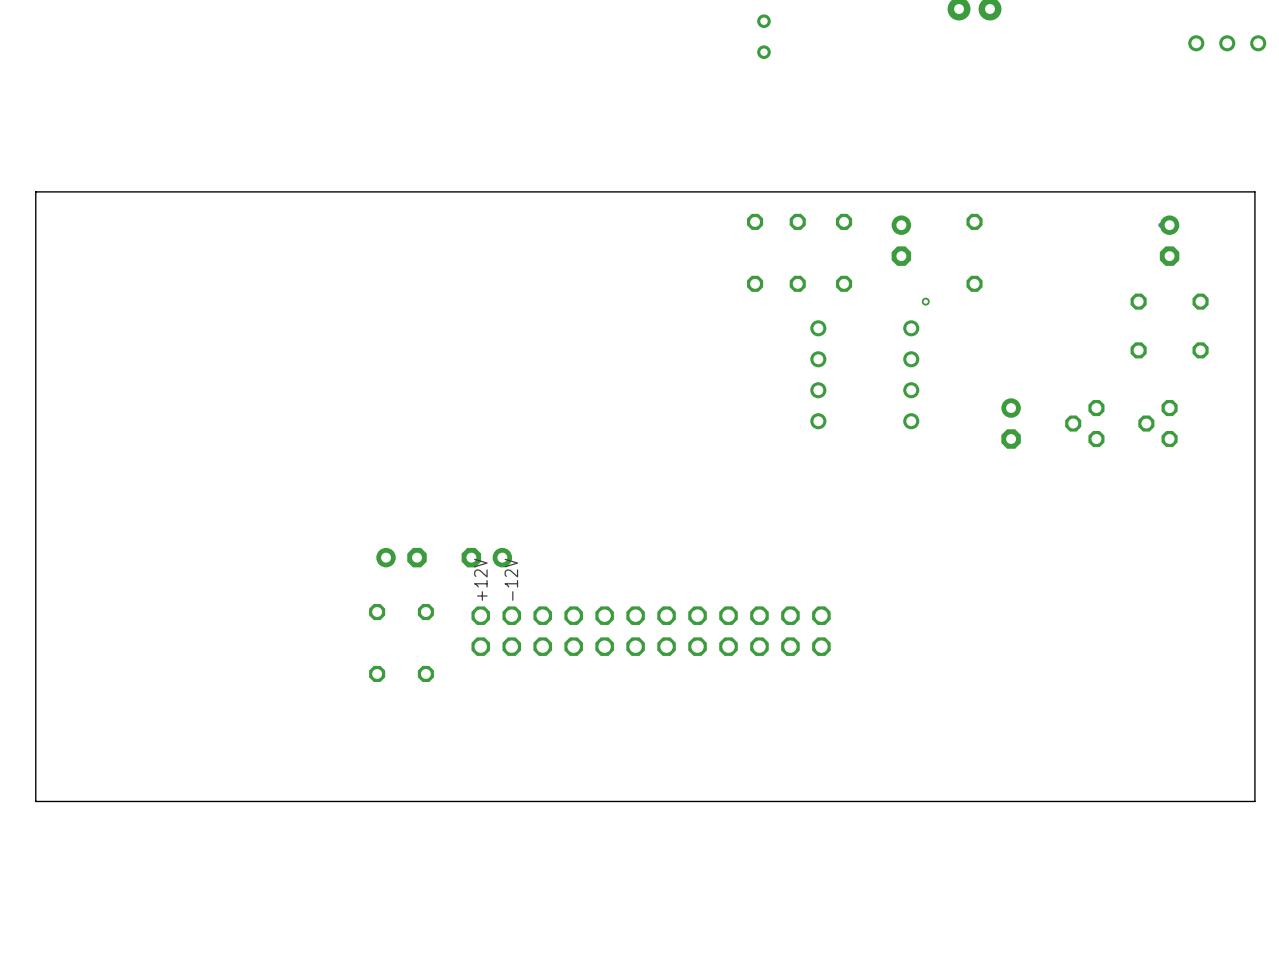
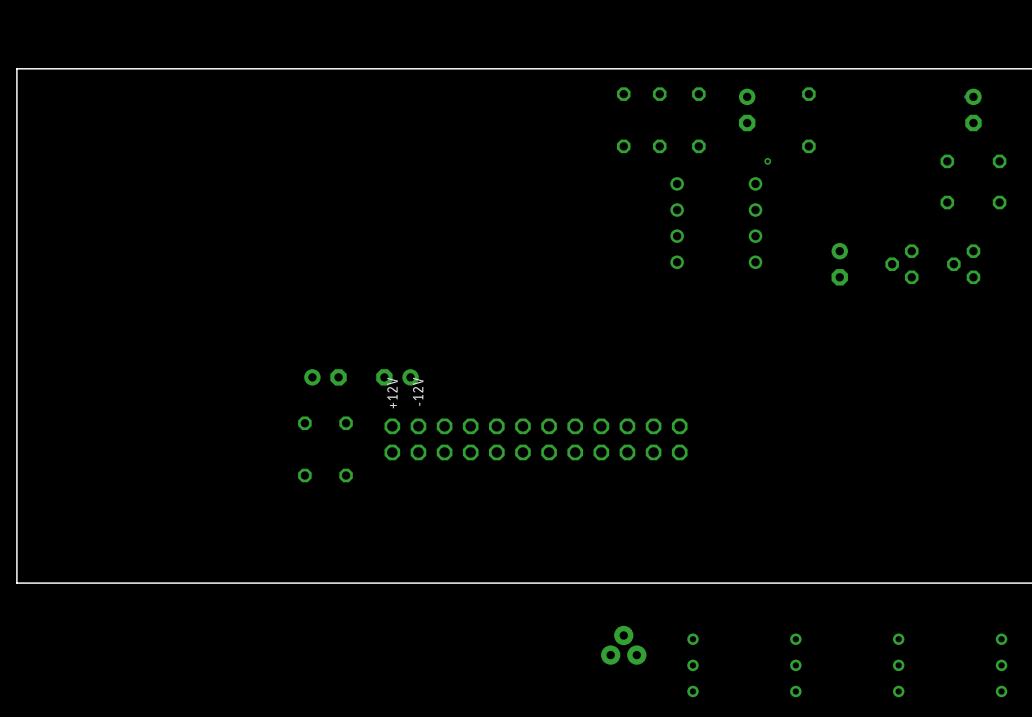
part: none -> (623, 645)
part: none -> (692, 665)
part: none -> (795, 665)
part: none -> (898, 665)
part: none -> (1001, 665)

